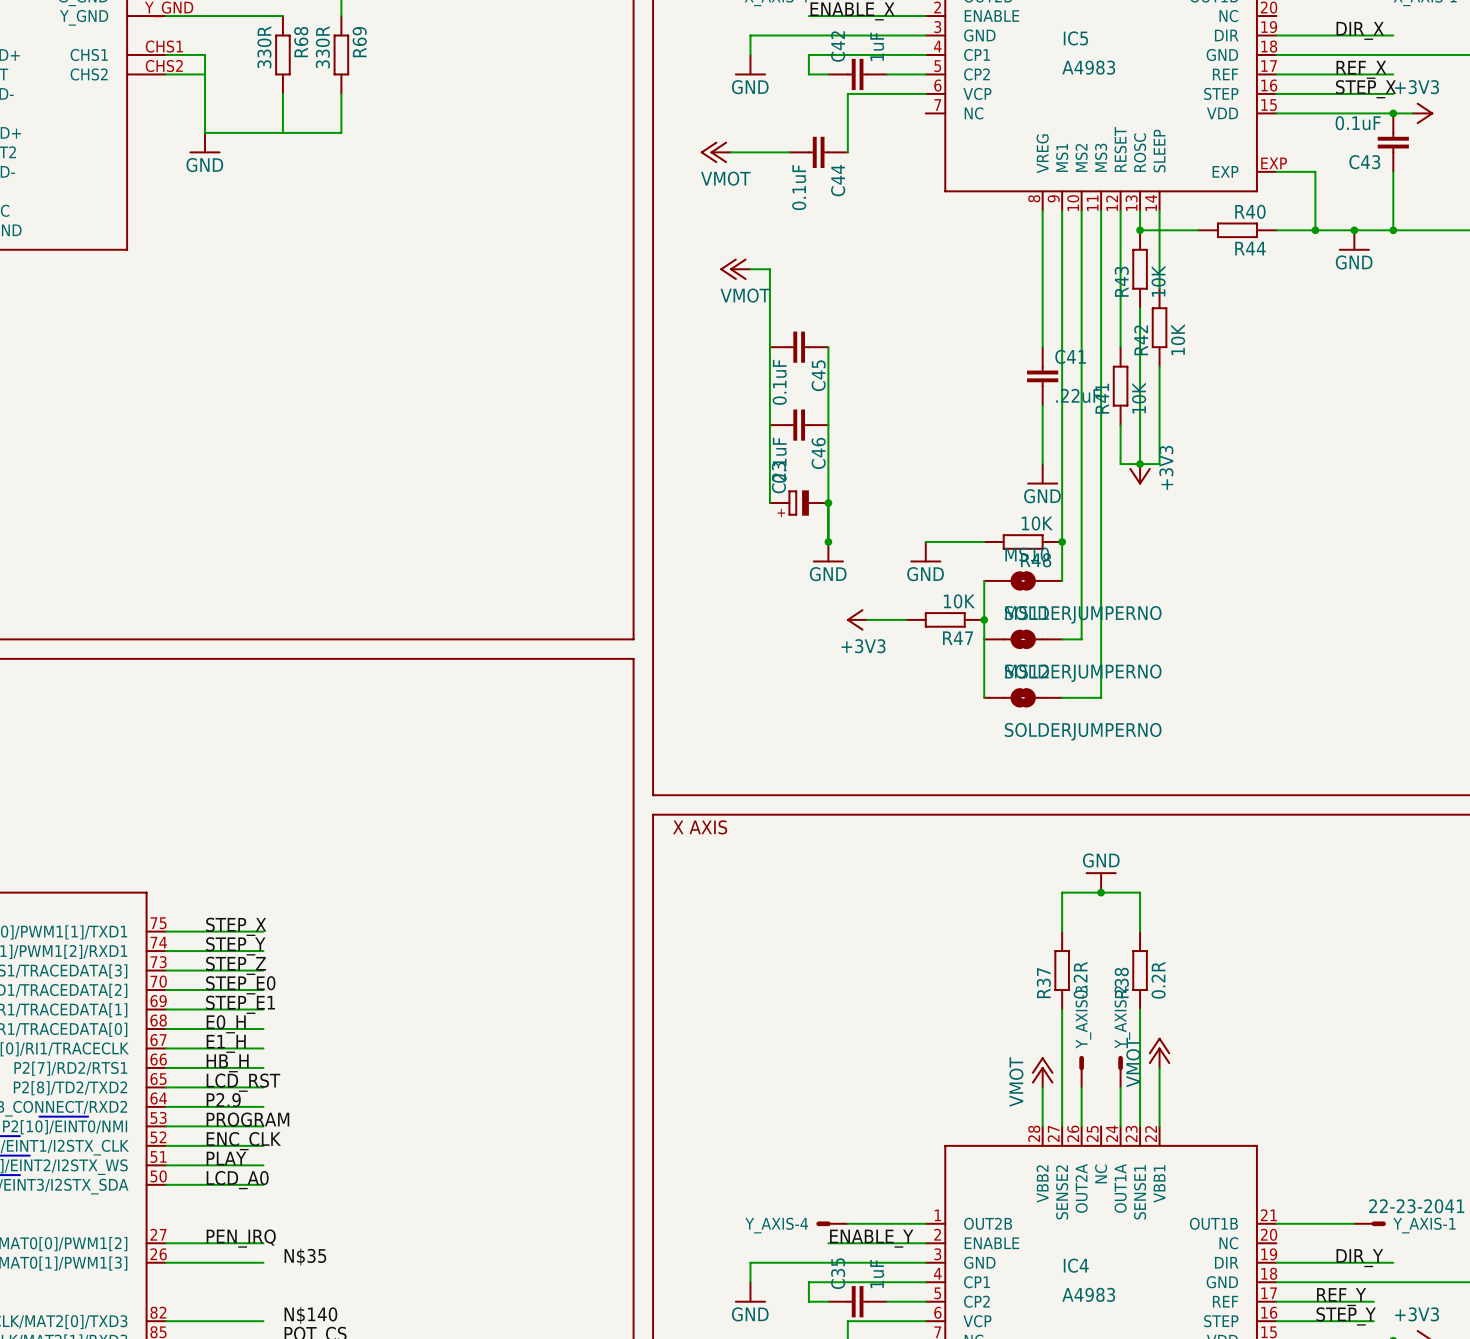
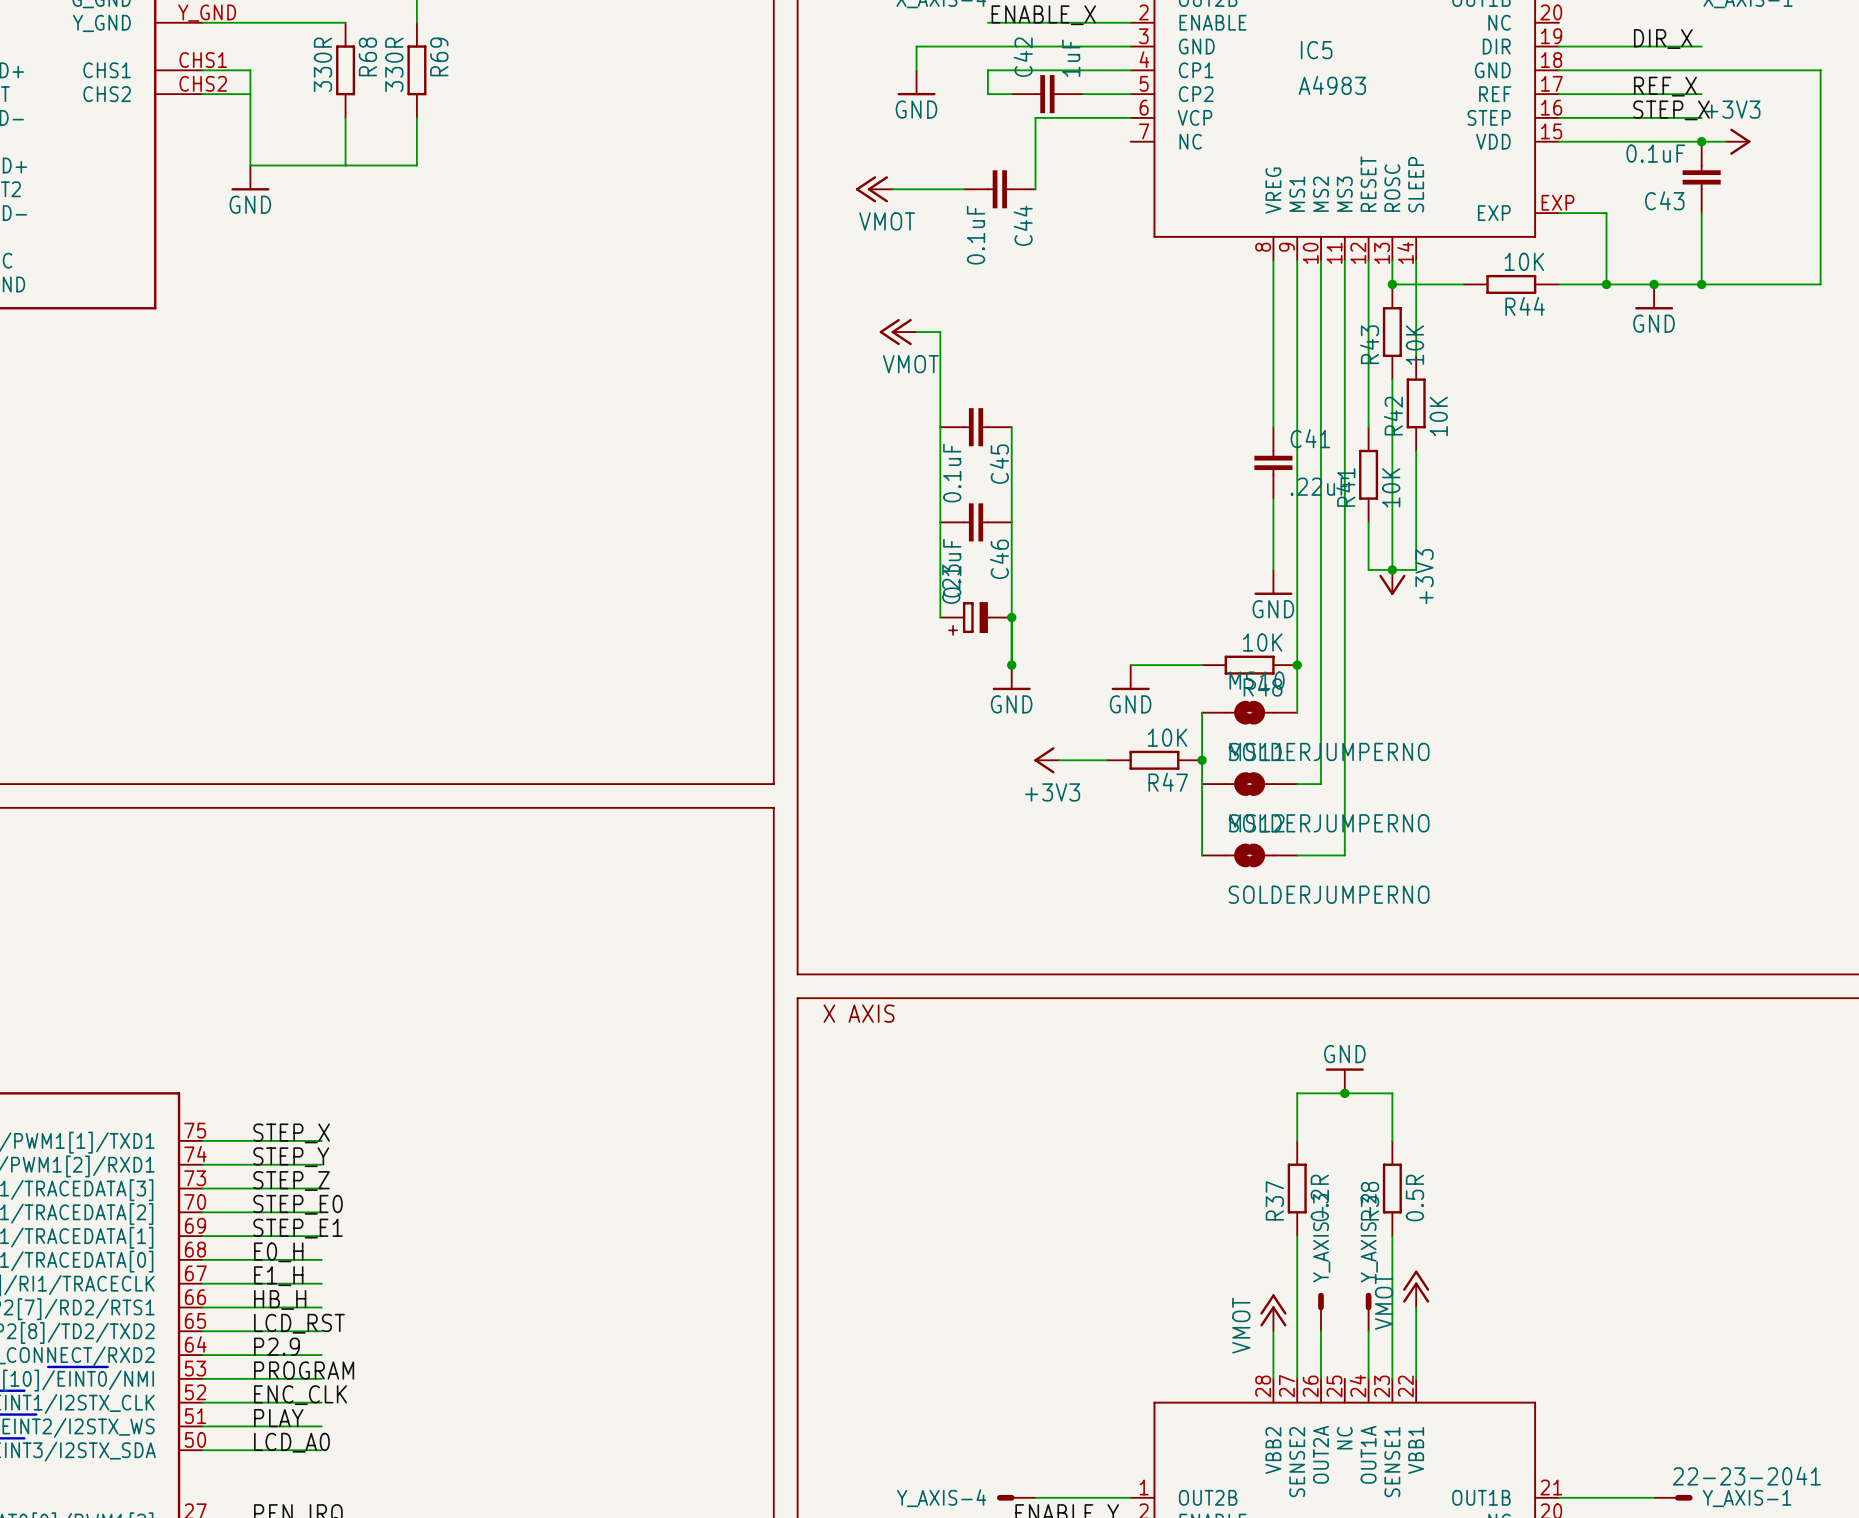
R44 value: R40 (1250, 211) -> 10K (1524, 261)
R38 value: 0.2R (1158, 980) -> 0.5R (1414, 1198)

